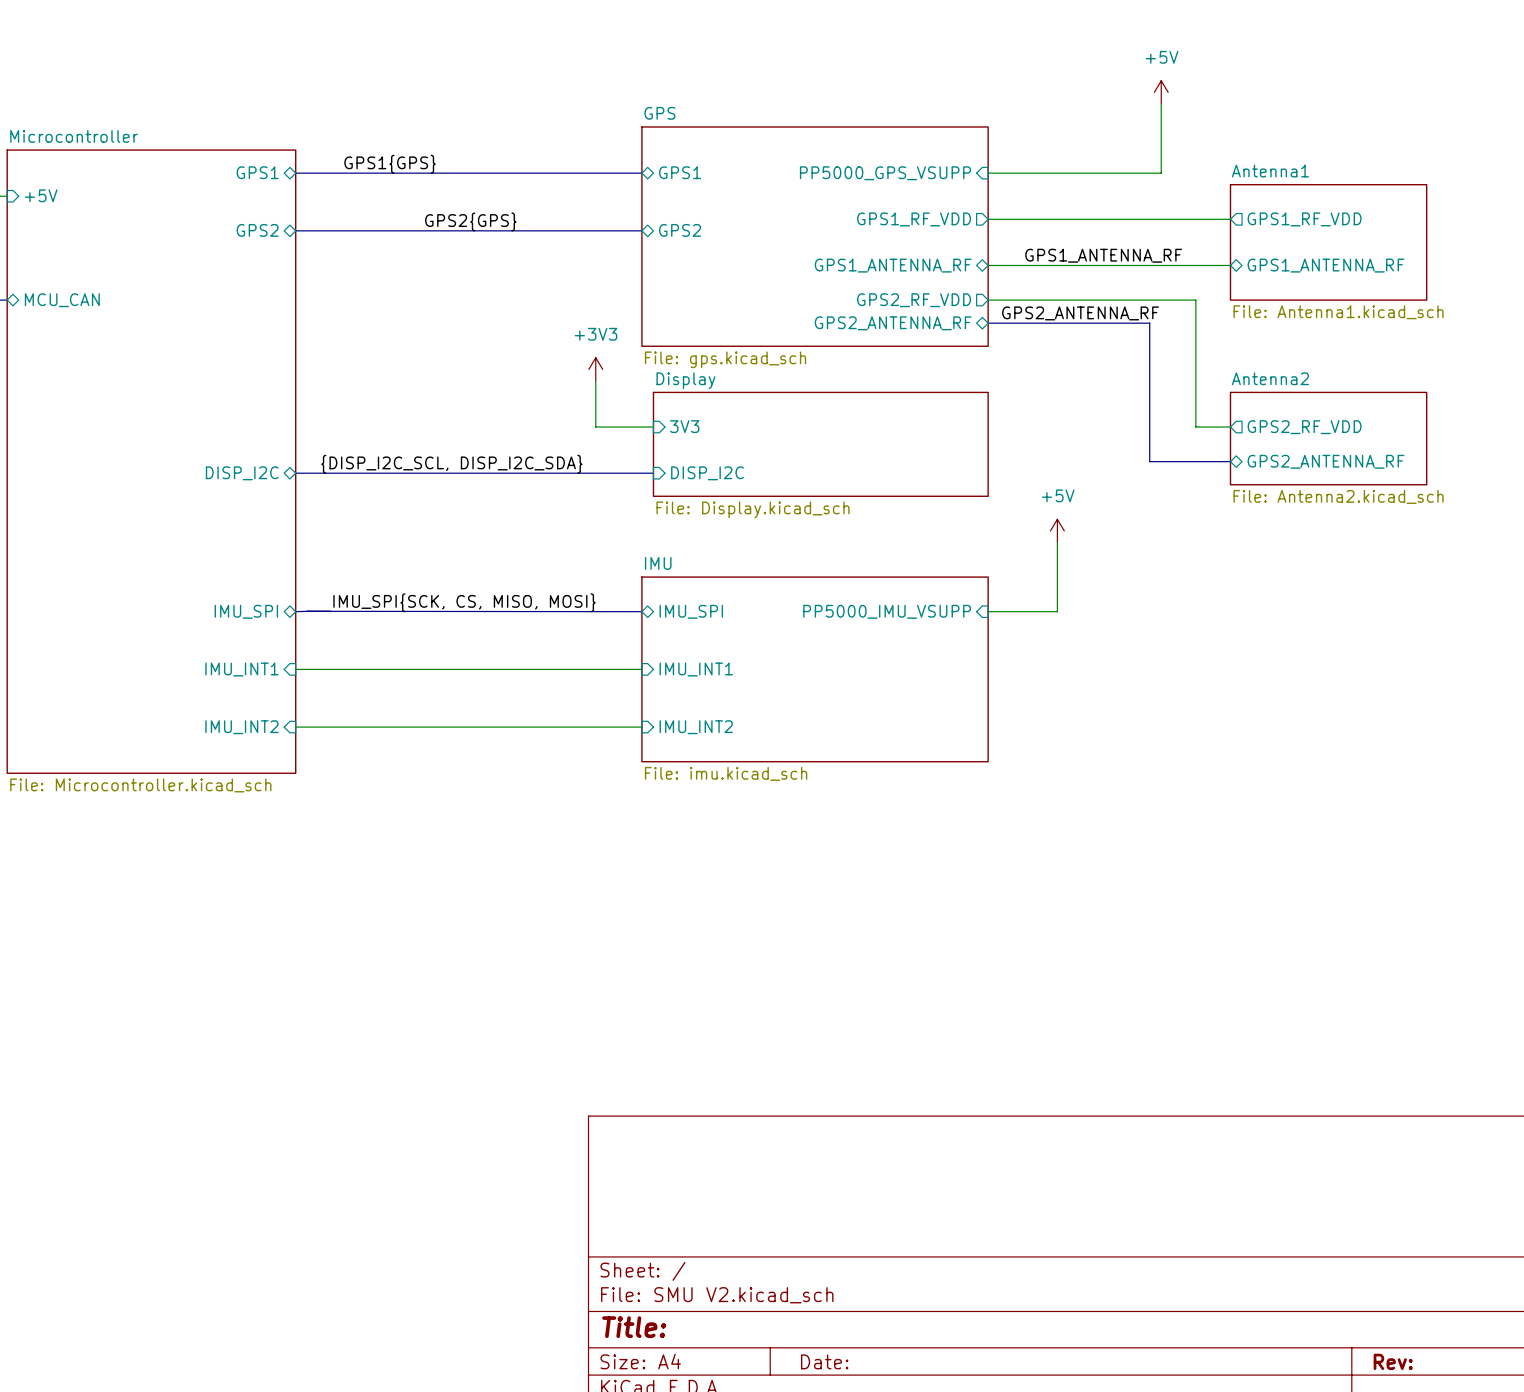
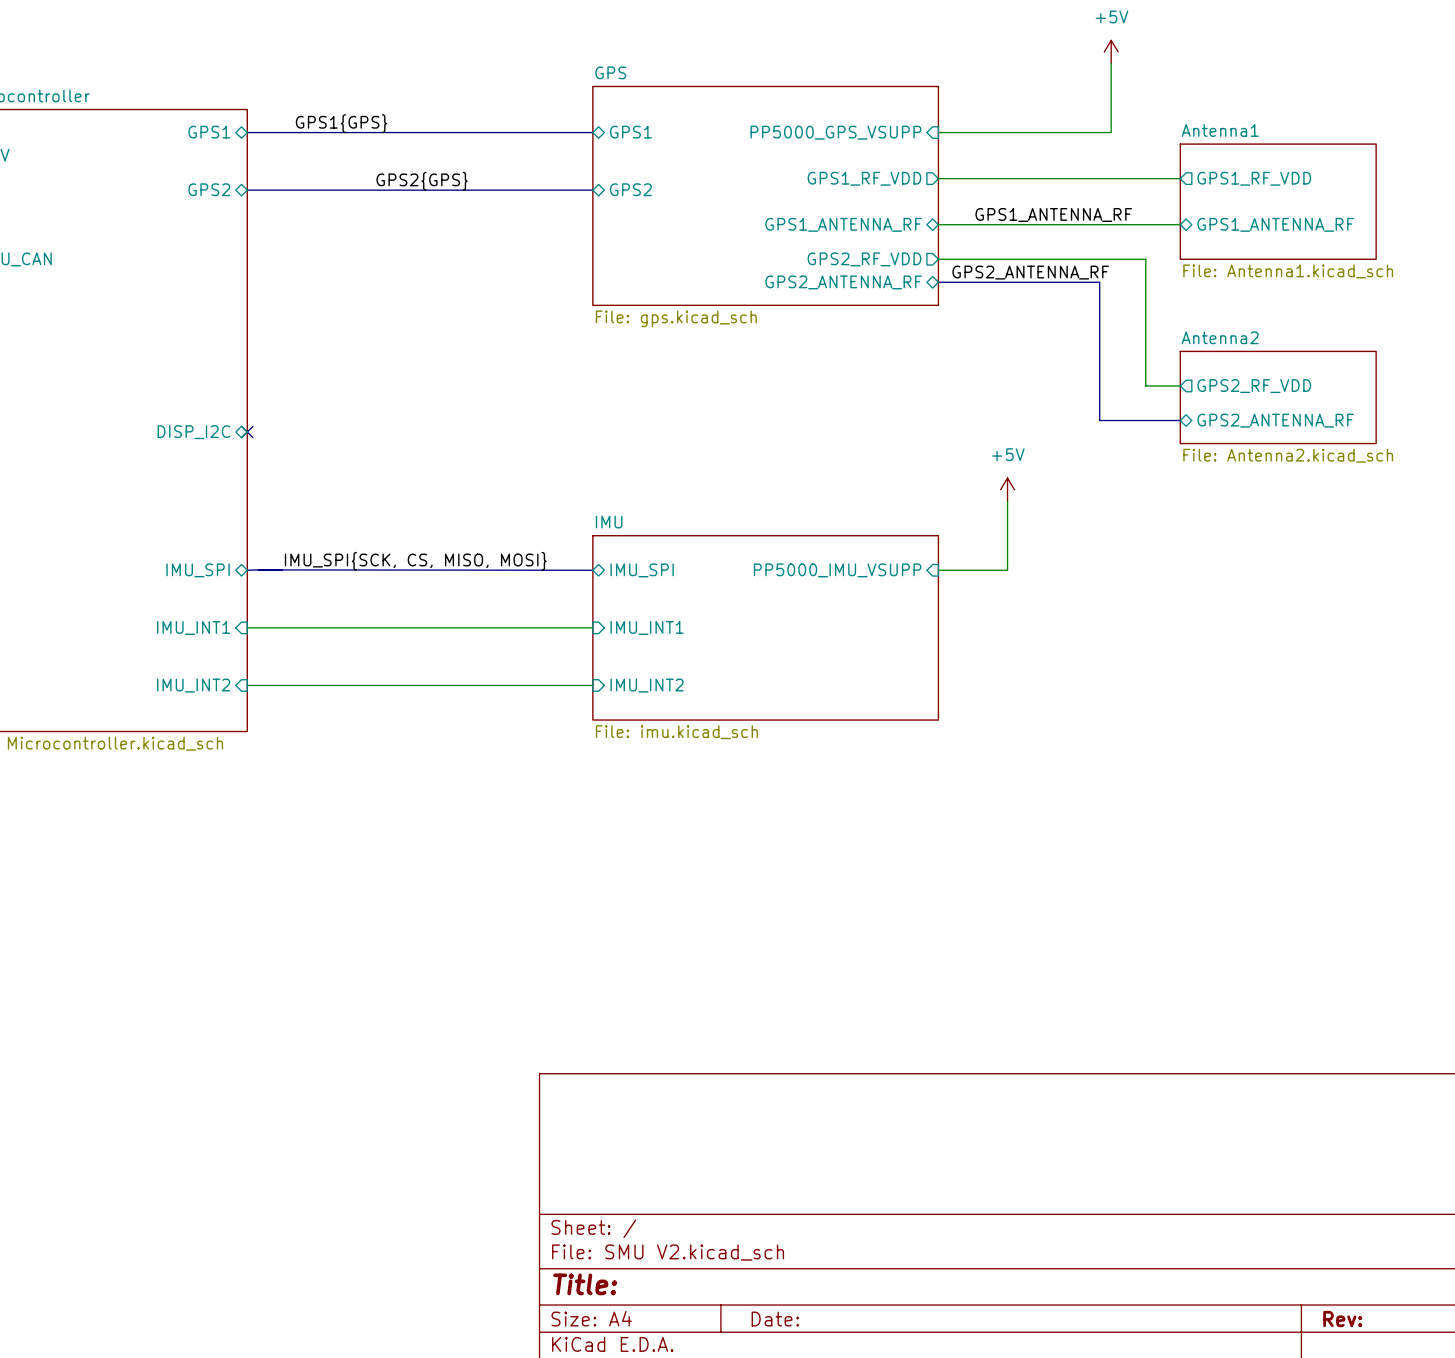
power symbol: +3V3 (595, 369) -> none
wire: (595, 380) (595, 427) (653, 427) -> none
sheet pin: 3V3 (684, 426) -> none
sheet Display: File: Display.kicad_sch (820, 444) -> none
label: {DISP_I2C_SCL, DISP_I2C_SDA} (451, 464) -> none
bus: (295, 473) (653, 473) -> none
no-connect mark: none -> (247, 432)
sheet pin: DISP_I2C (707, 473) -> none

